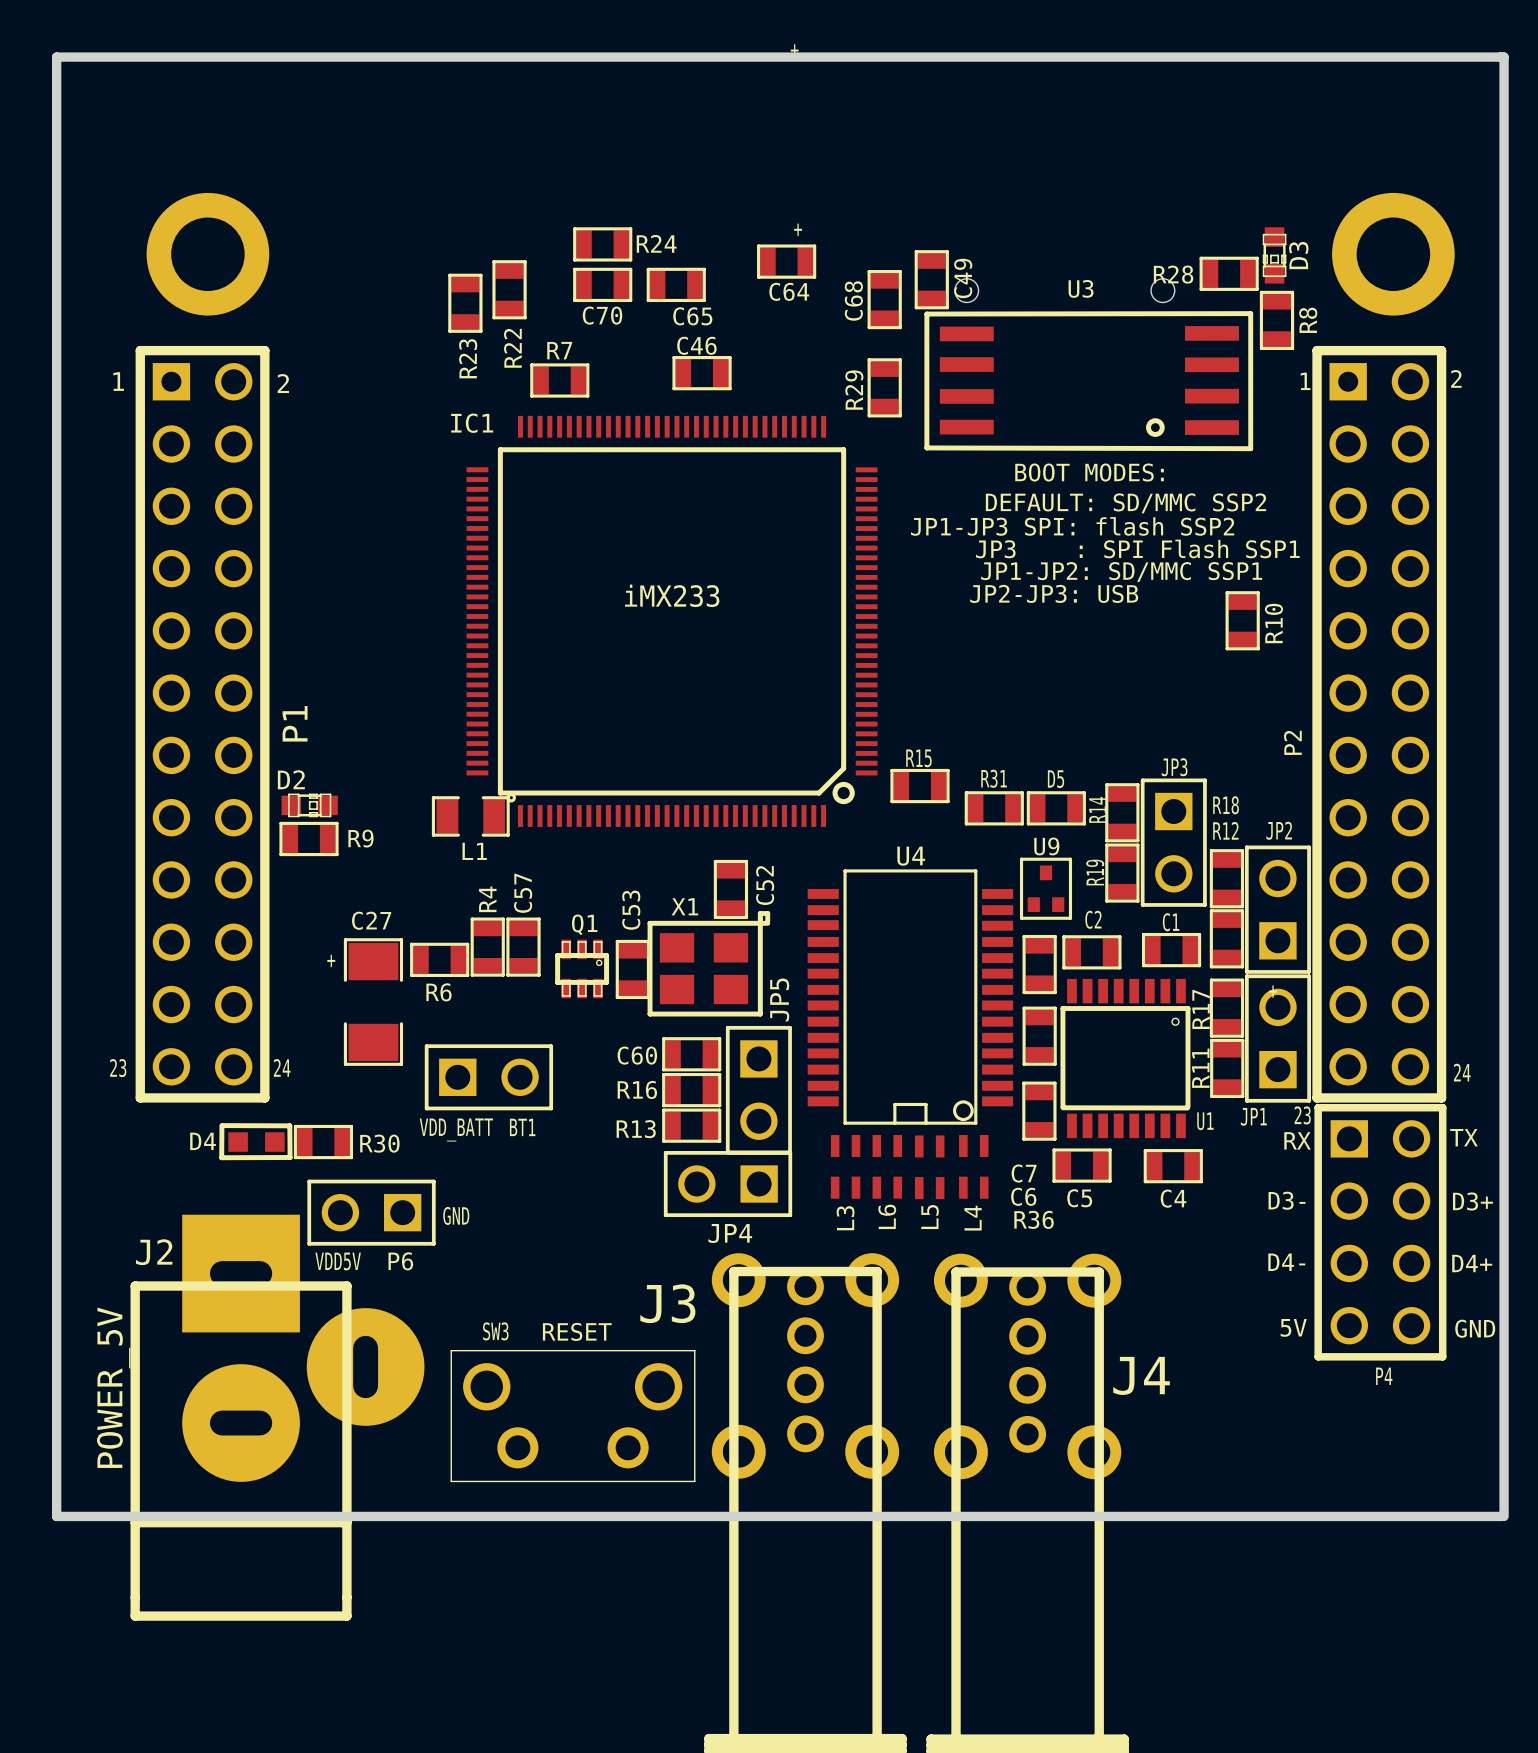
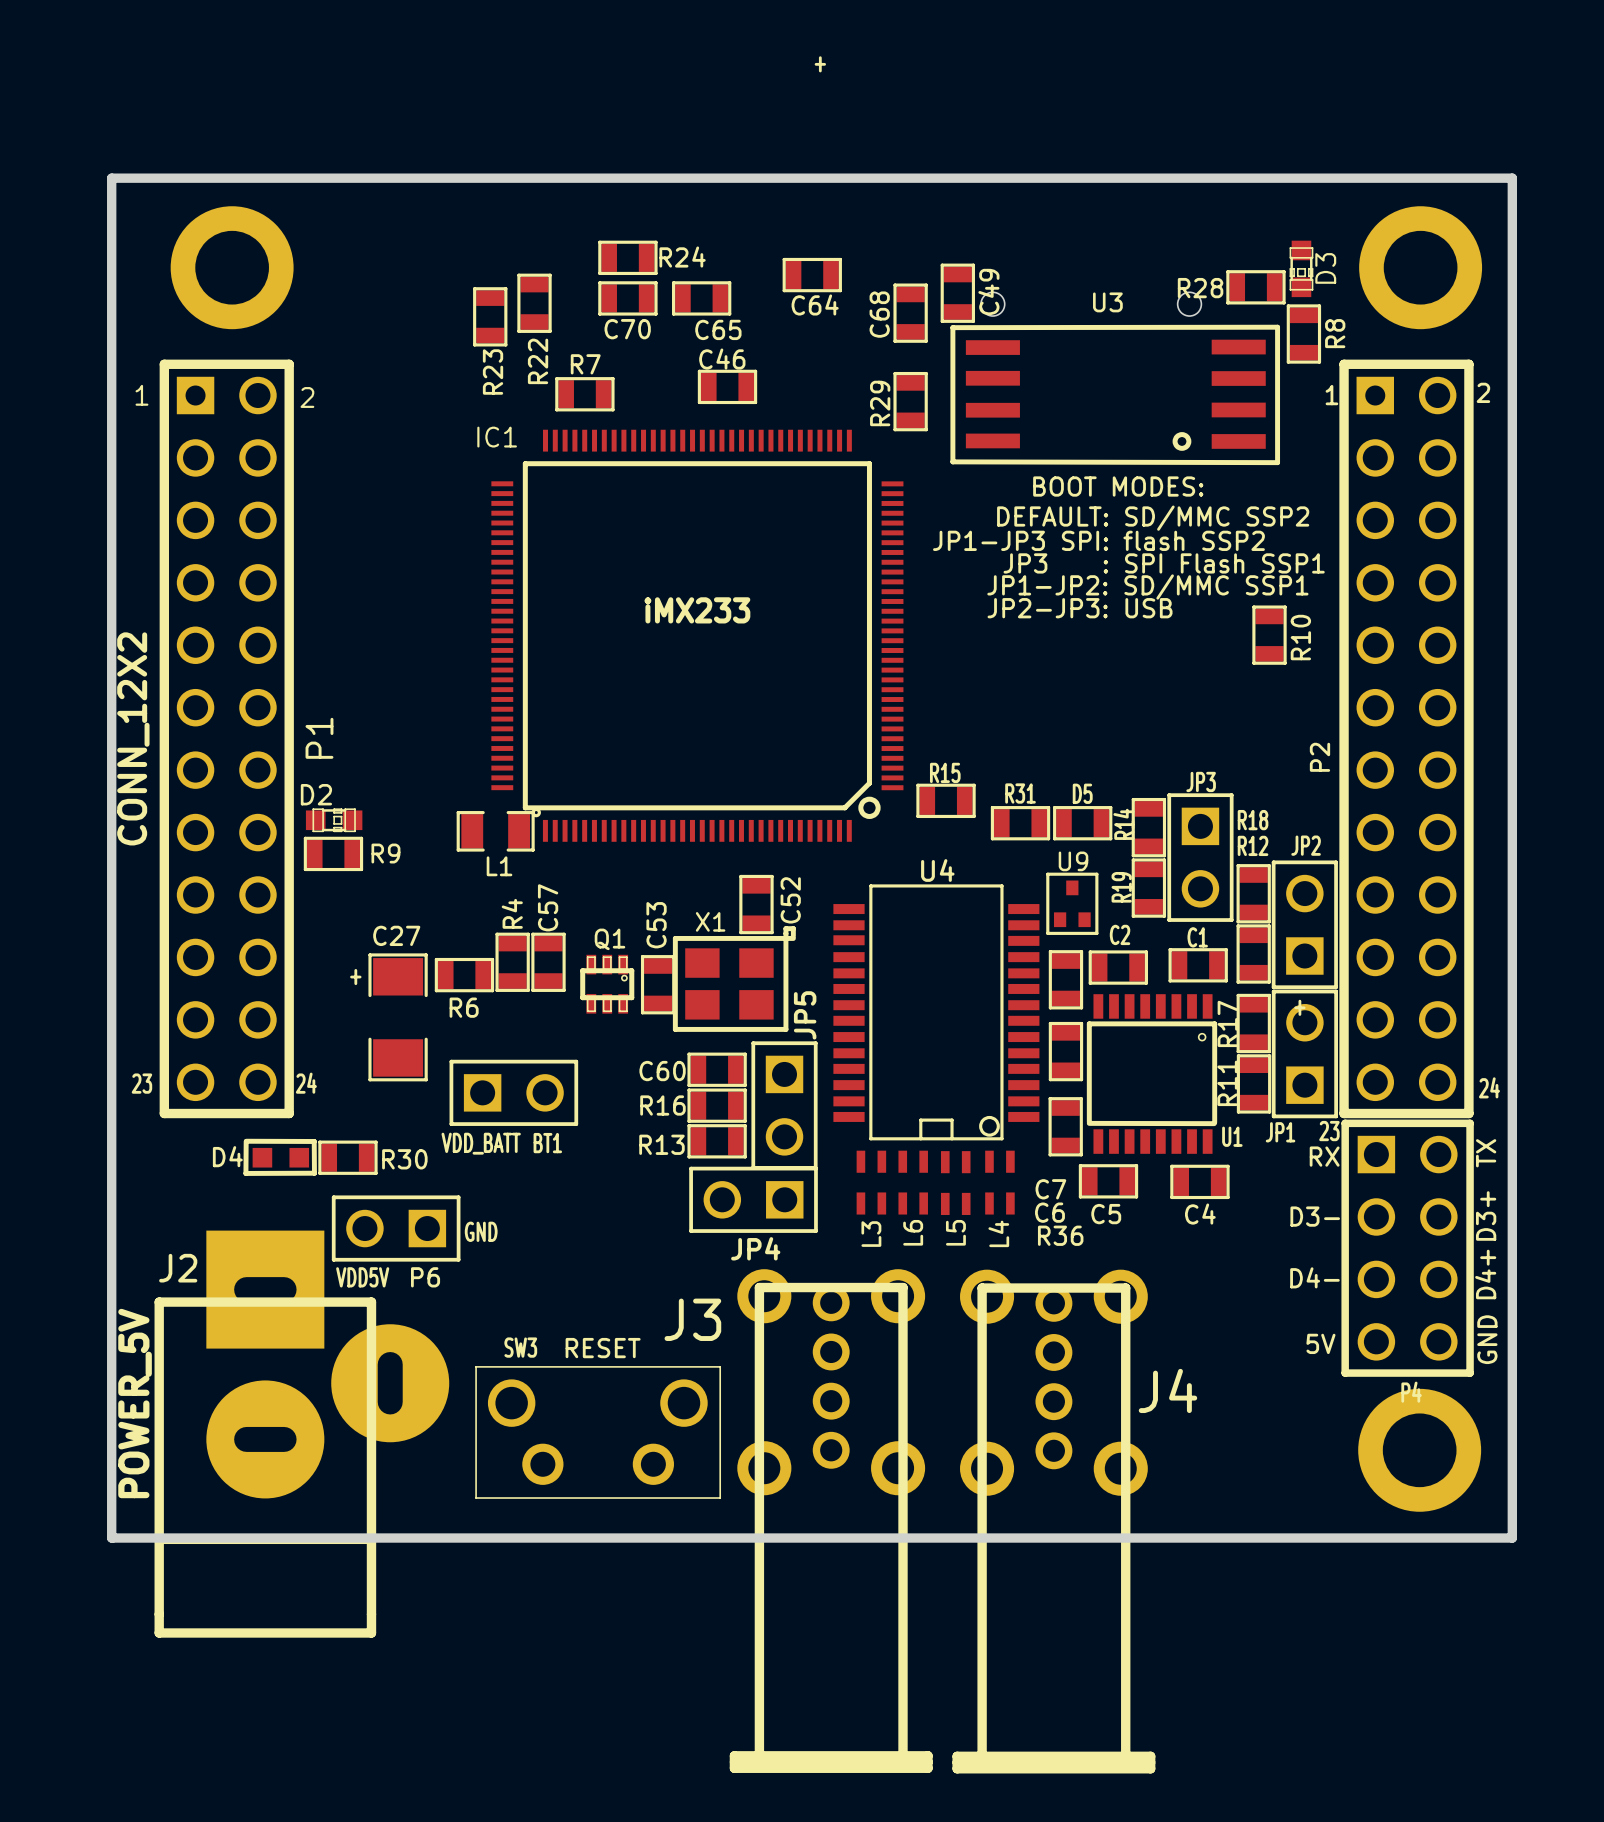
text: + (798, 229) -> none
P1 value: none -> CONN_12X2 (133, 738)
text rotation: 0° (1463, 1137) -> 90° counterclockwise (1486, 1153)
text rotation: 0° (1472, 1201) -> 90° counterclockwise (1486, 1215)
text rotation: 0° (1472, 1263) -> 90° counterclockwise (1485, 1274)
text rotation: 0° (1475, 1328) -> 90° counterclockwise (1487, 1339)
part: none -> (1419, 1450)
board edge: (1502, 1516) (56, 1516) (56, 57) (1504, 57) (1504, 1516) -> none
board edge: none -> (112, 1538) (111, 178) (1512, 178) (1512, 1538) (113, 1538)

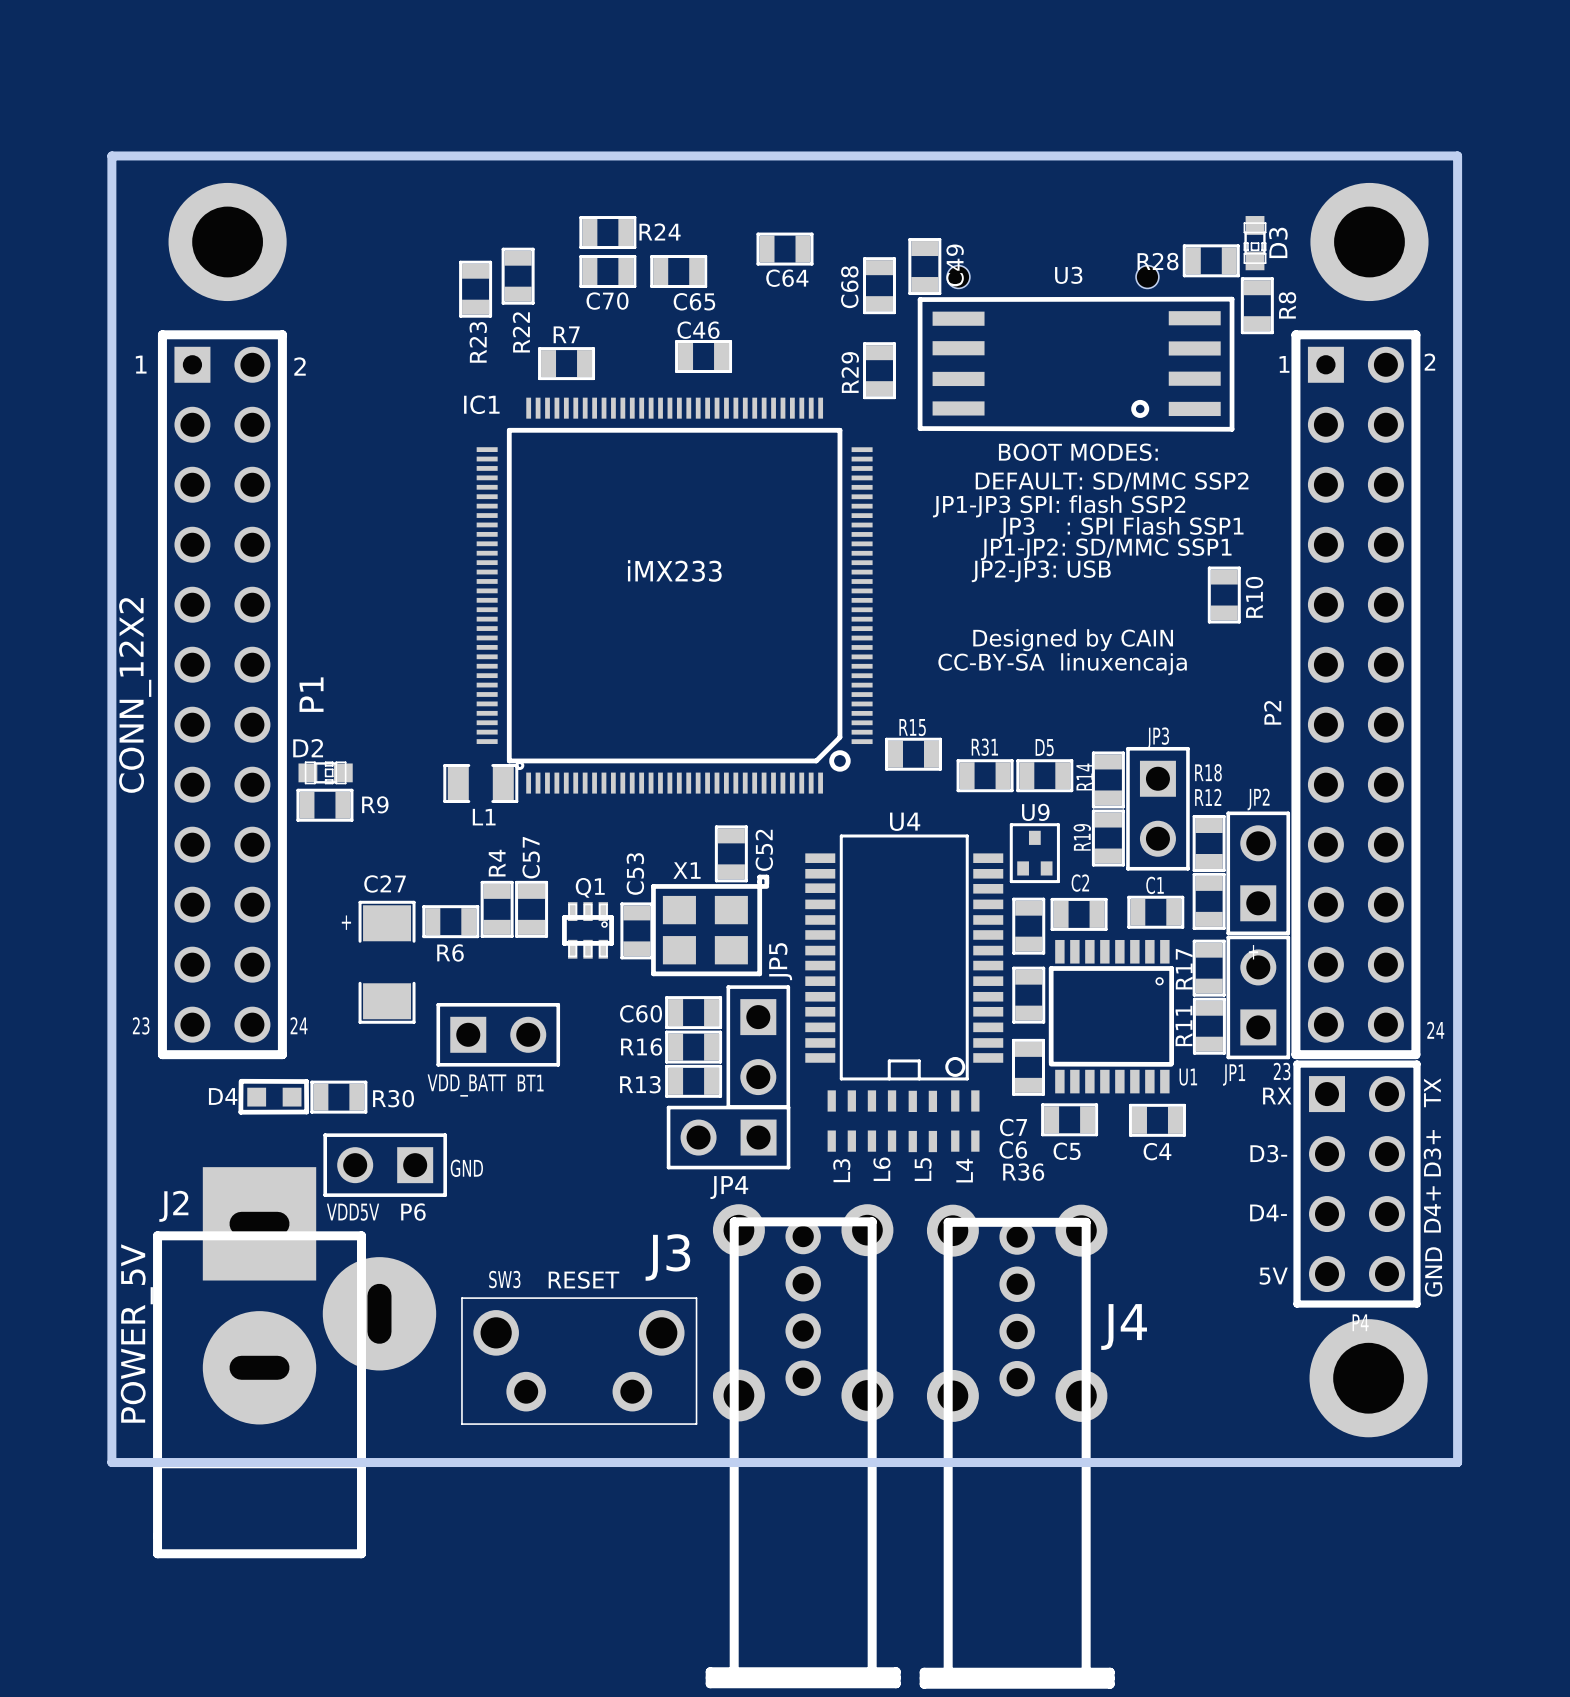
text: + (820, 64) -> none
text: none -> Designed by CAIN (1073, 640)
text: none -> CC-BY-SA linuxencaja (1062, 664)

